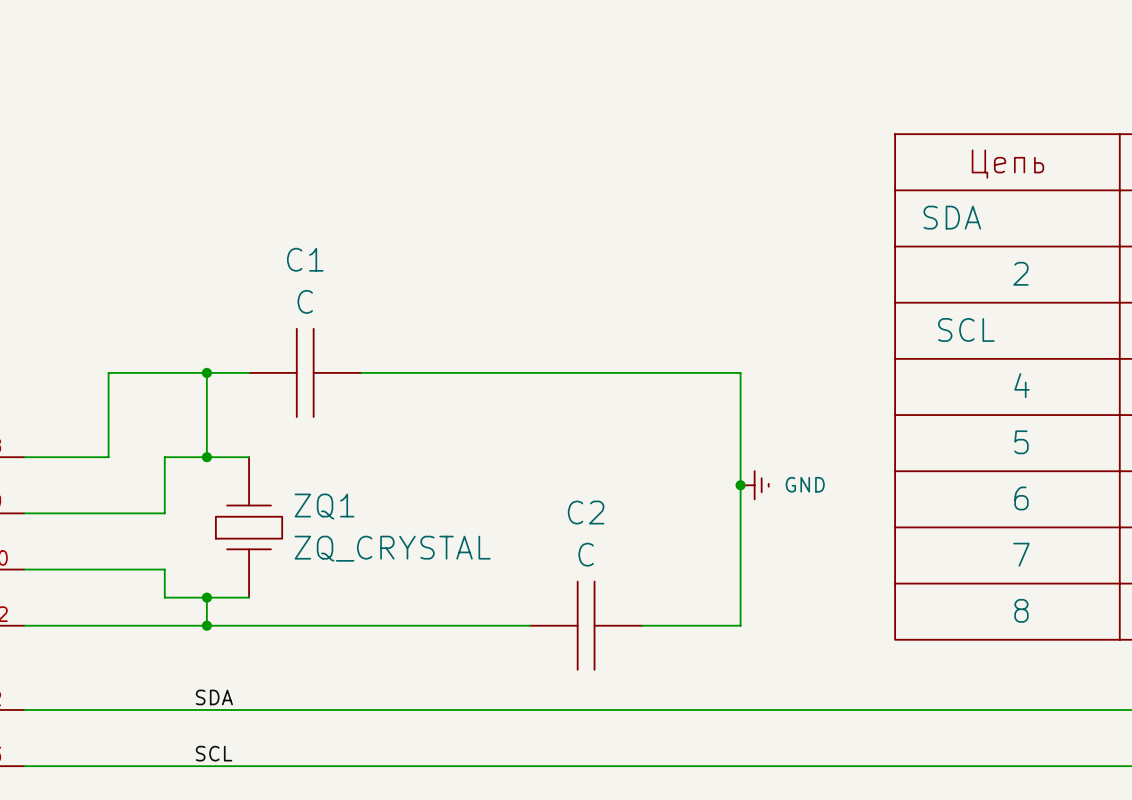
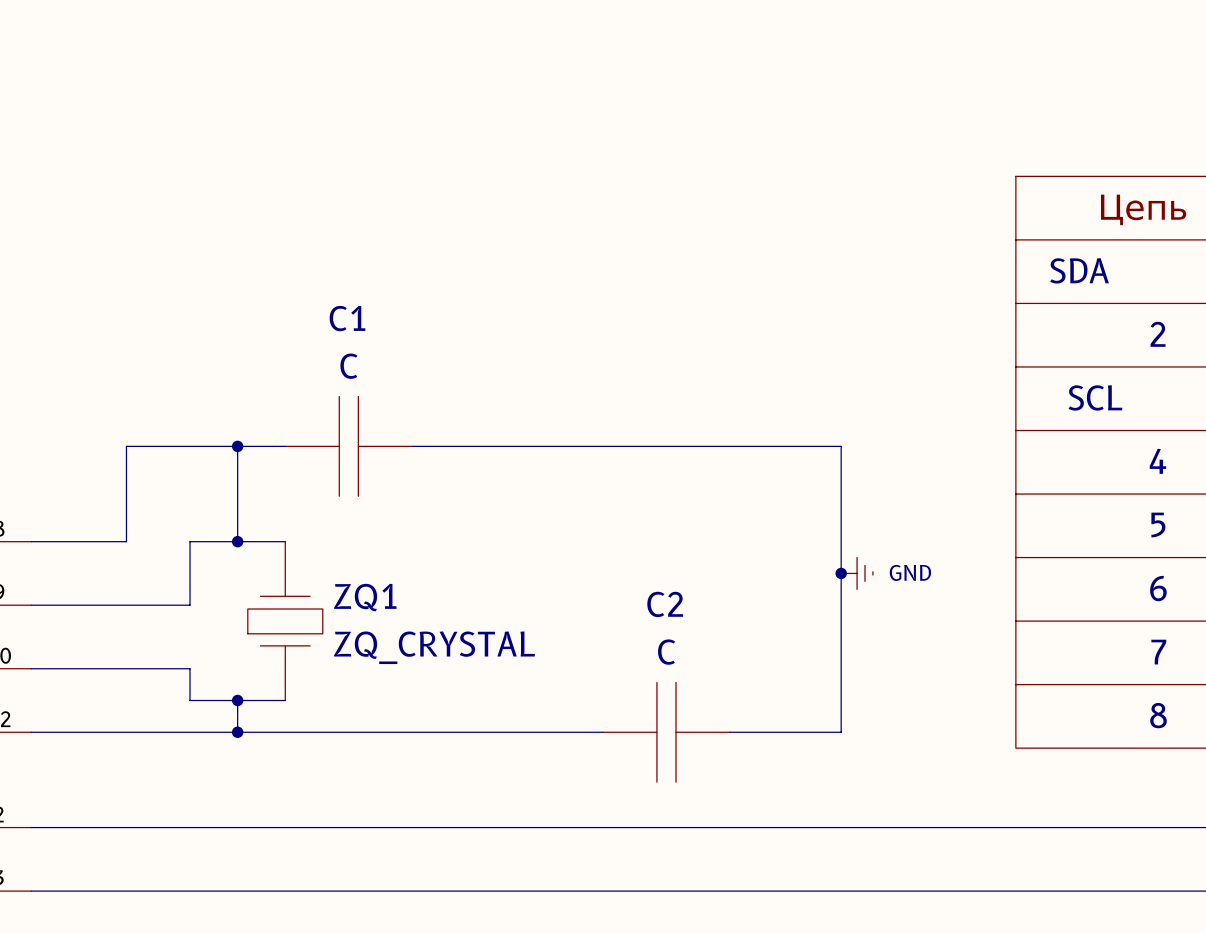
label: SDA (214, 697) -> none
label: SCL (214, 753) -> none

